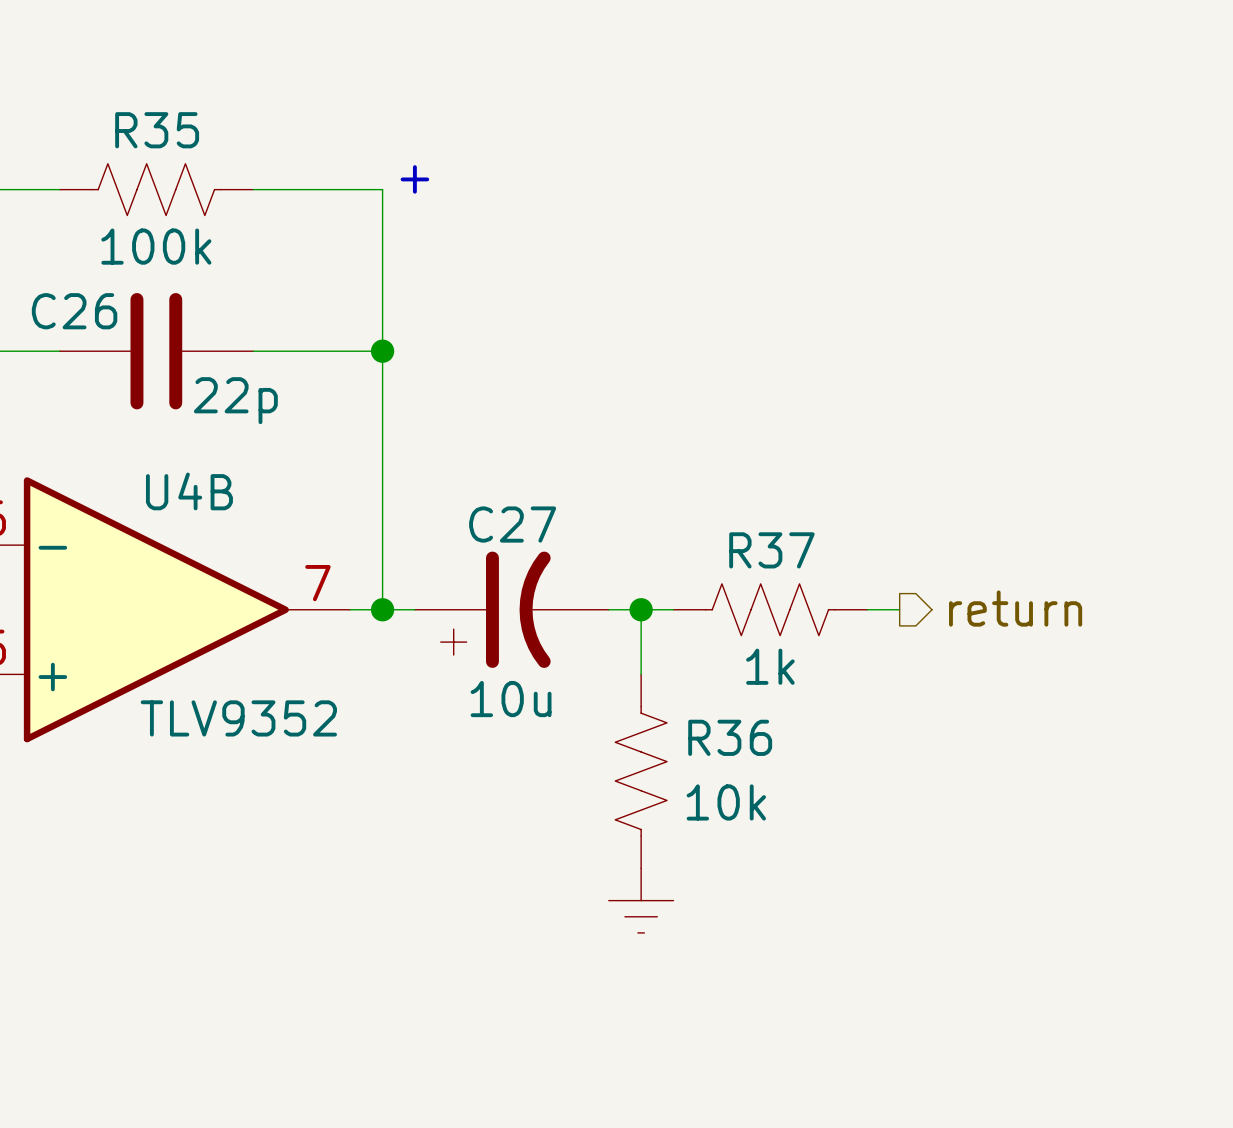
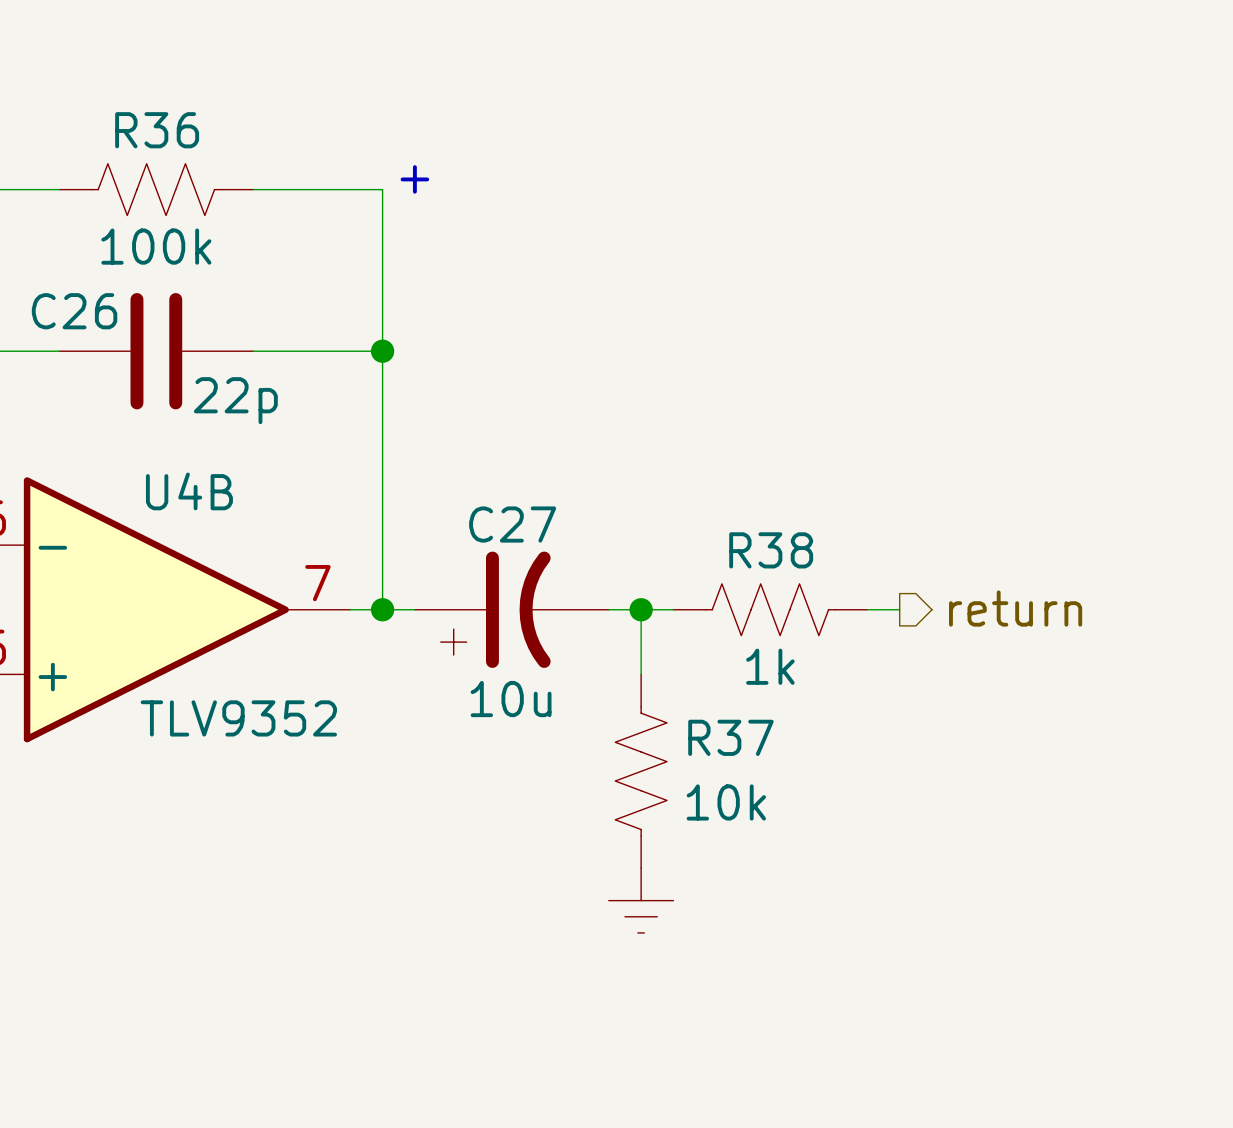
R35 name: R35 (157, 130) -> R36 (157, 130)
R37 name: R37 (771, 550) -> R38 (771, 550)
R36 name: R36 (730, 737) -> R37 (730, 737)

